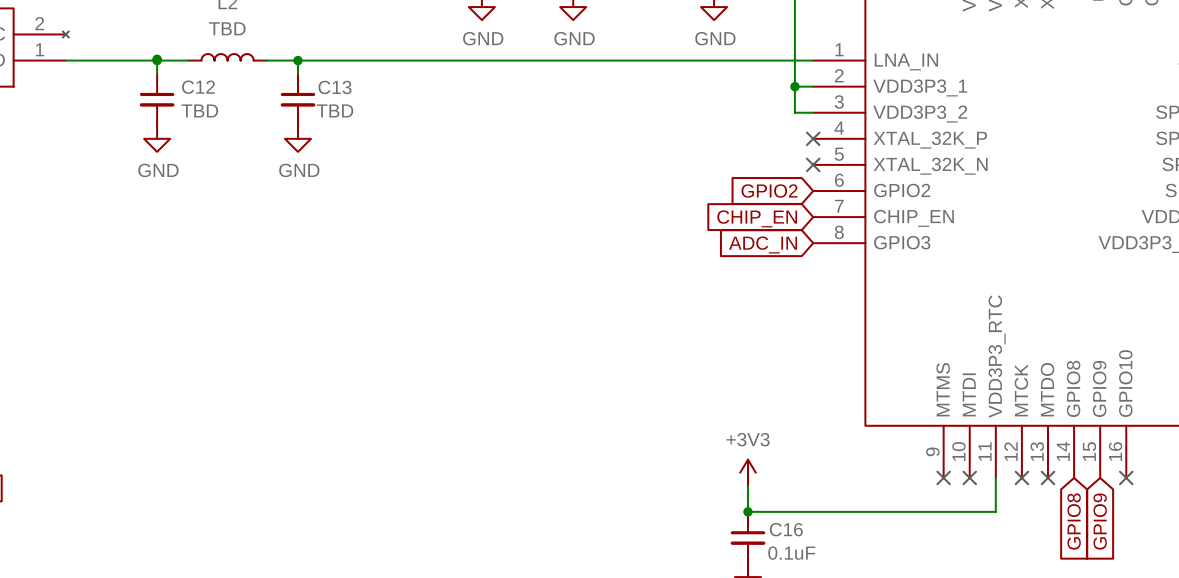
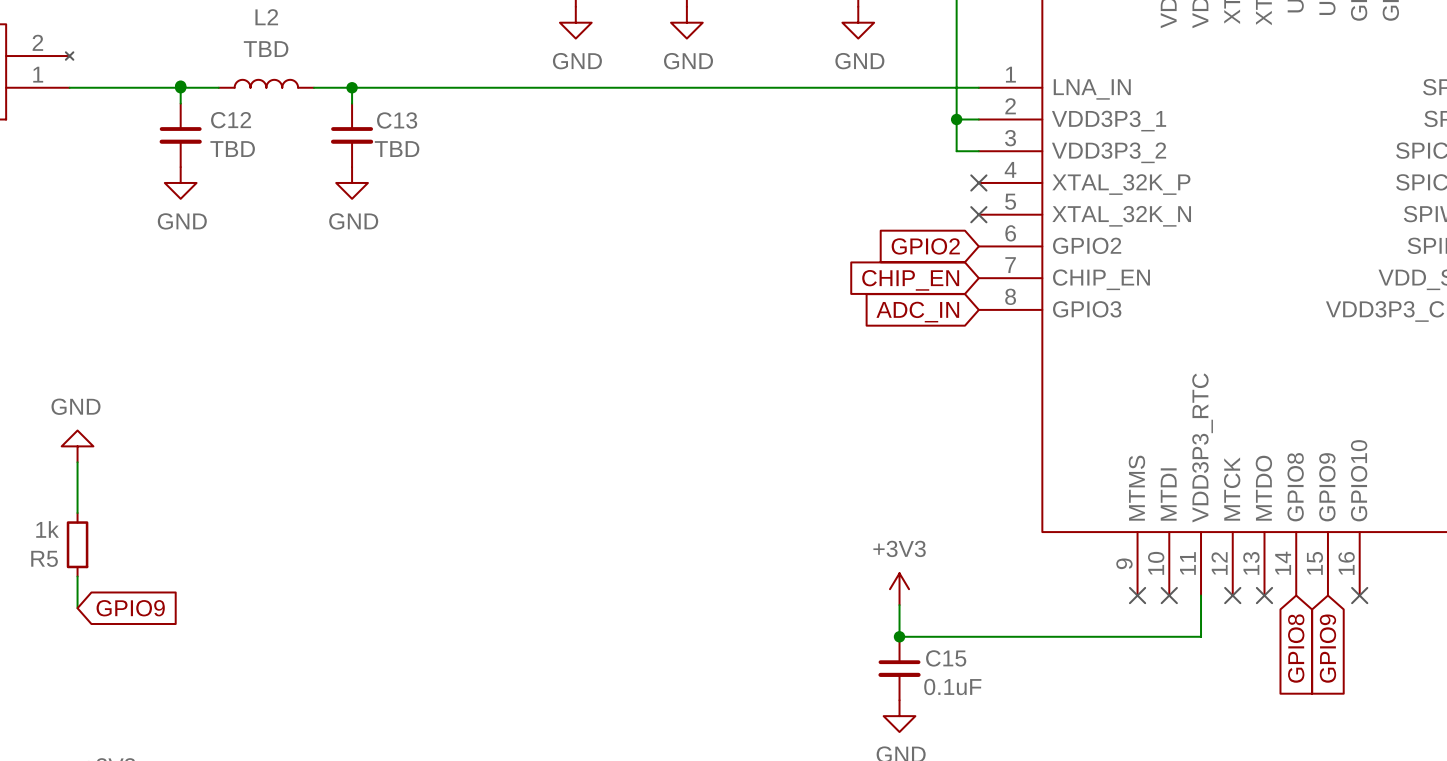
power symbol: none -> GND (77, 446)
wire: none -> (77, 462) (77, 513)
R5: none -> 1k (77, 544)
wire: none -> (77, 576) (77, 608)
global label: none -> GPIO9 (130, 608)
C16 name: C16 (786, 529) -> C15 (946, 658)

